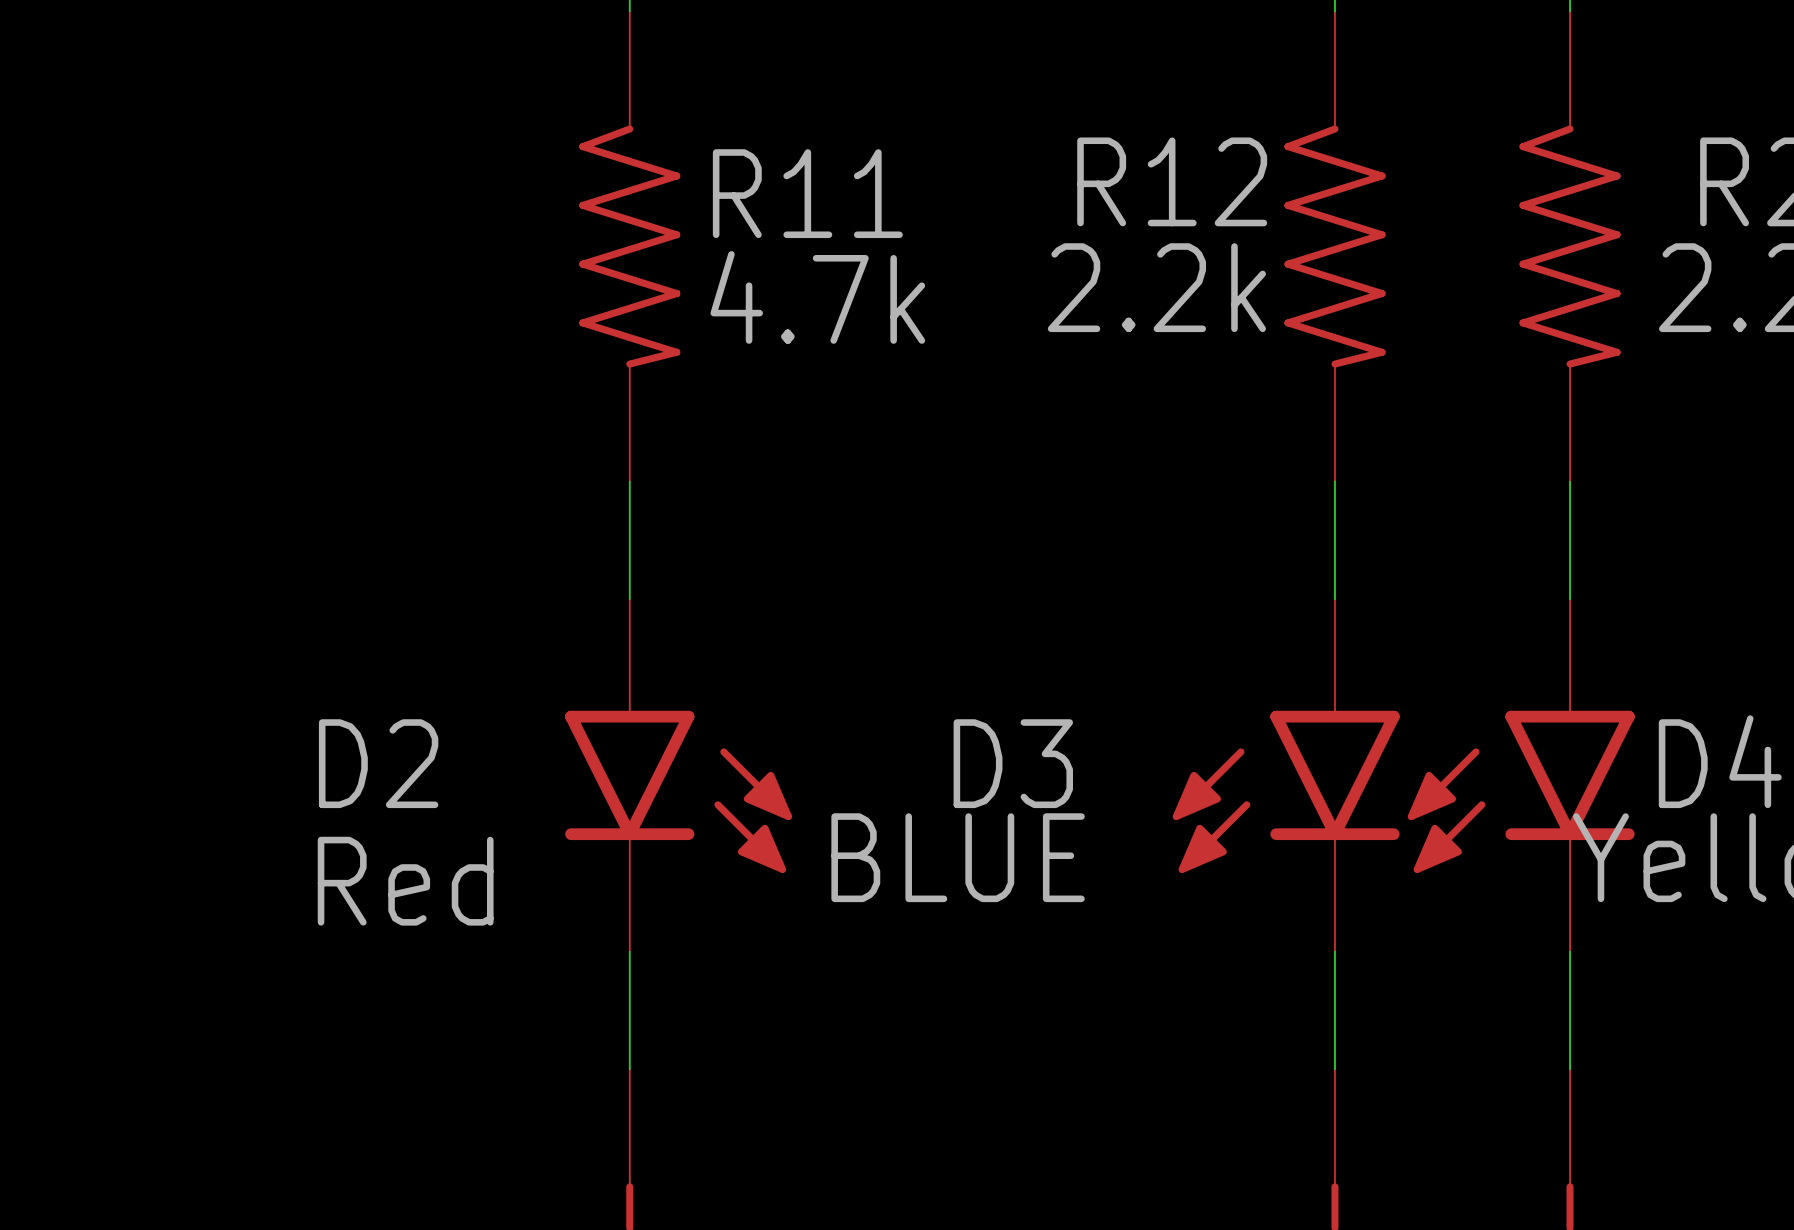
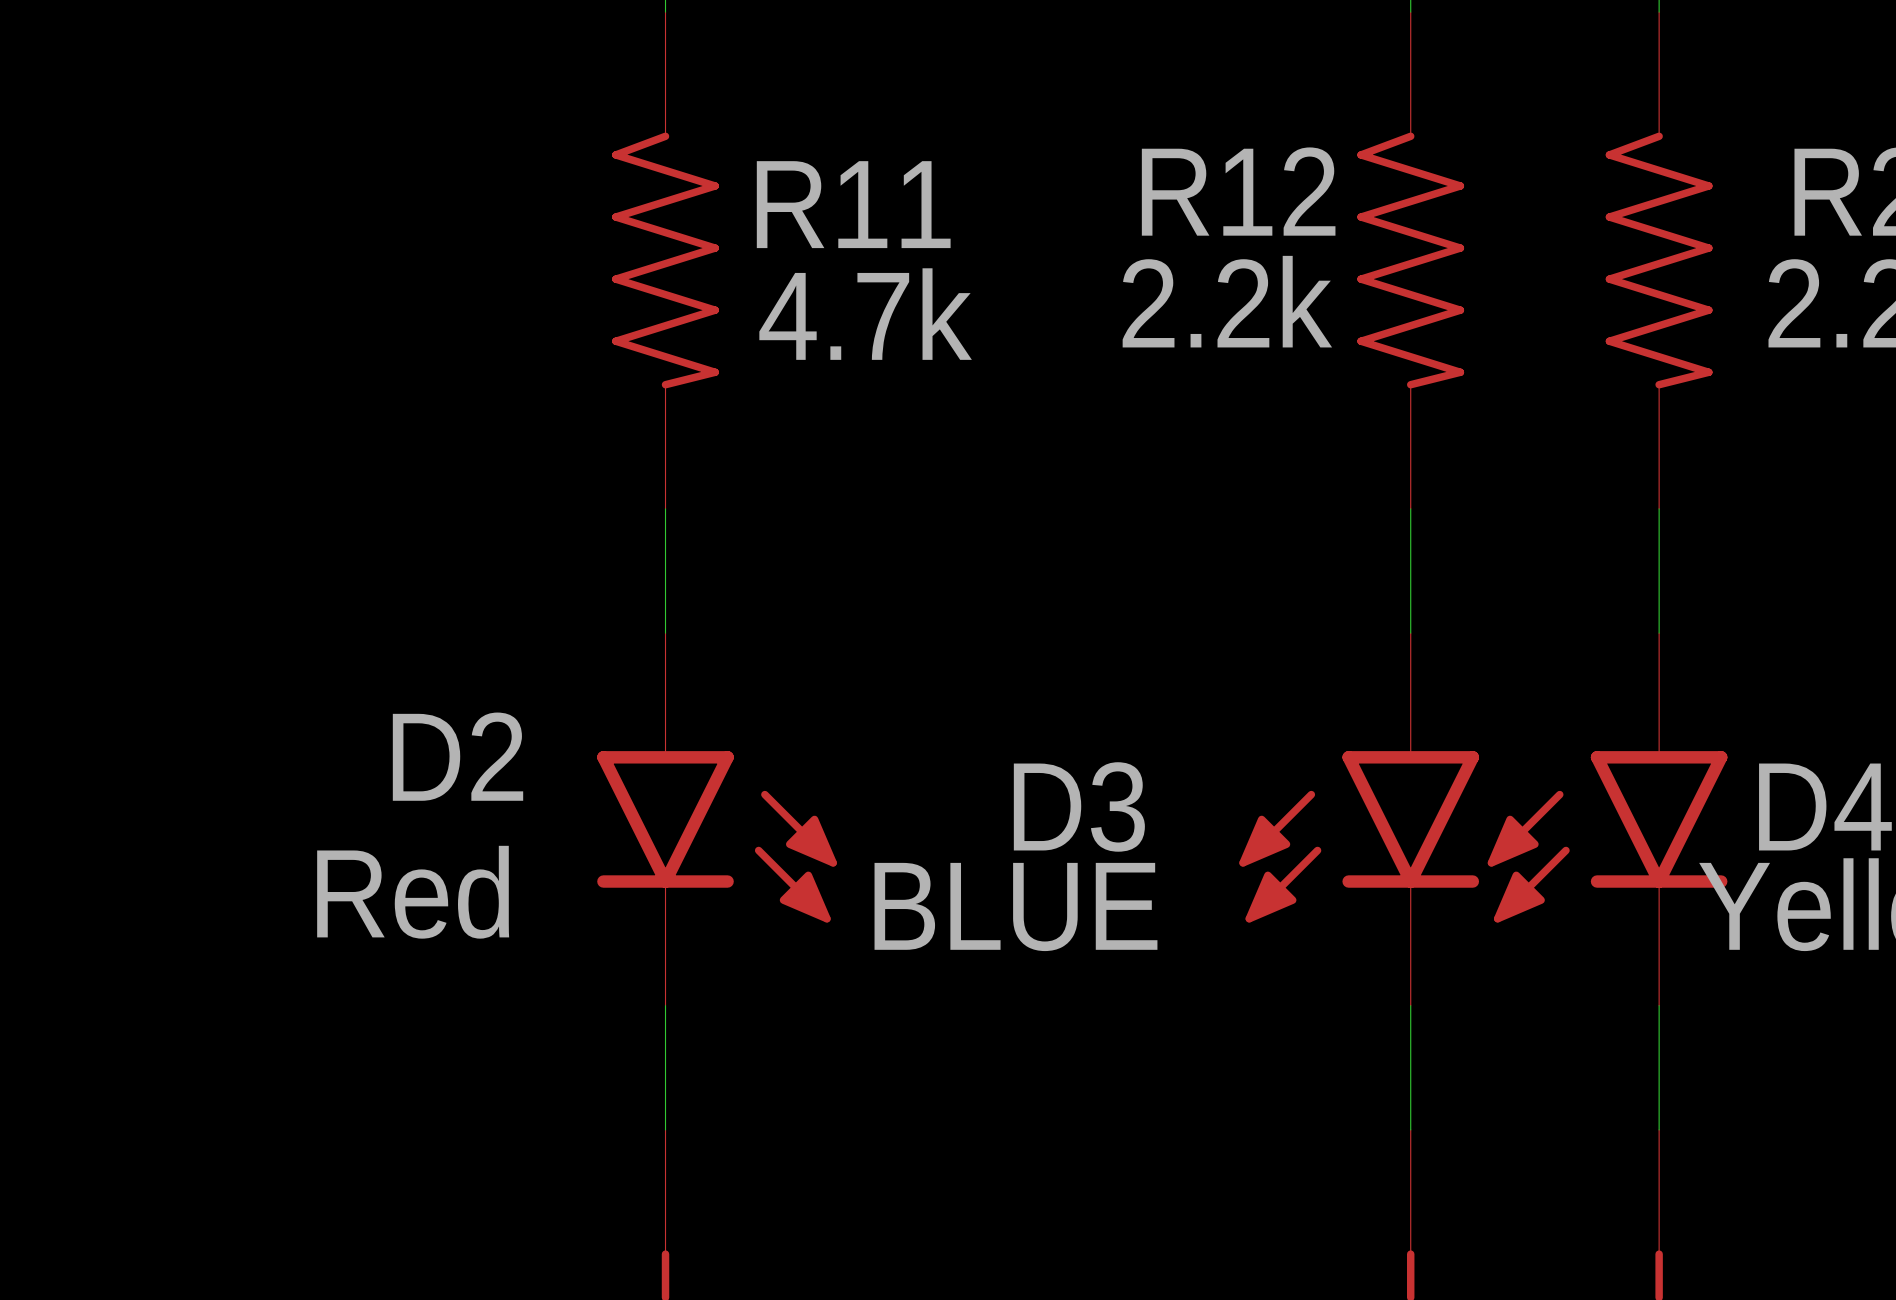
D2 name position: D2 (378, 763) -> D2 (458, 756)
D2 value position: Red (405, 881) -> Red (413, 892)

